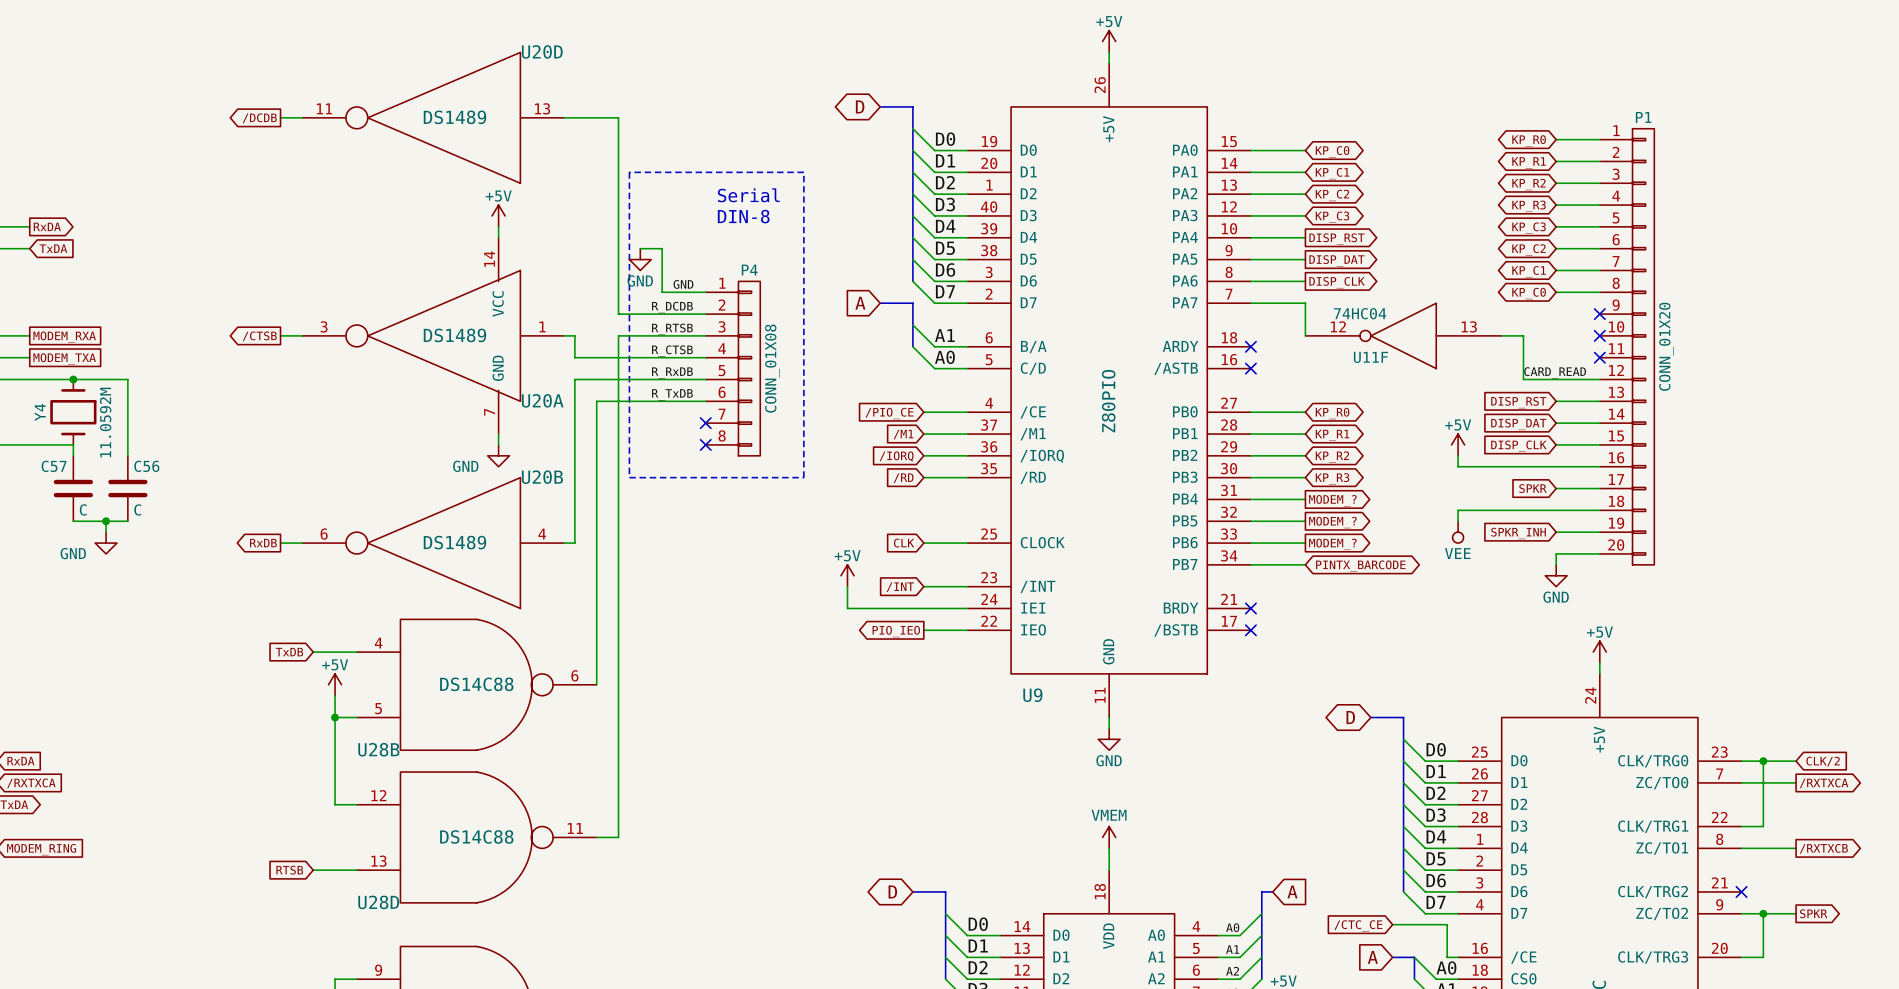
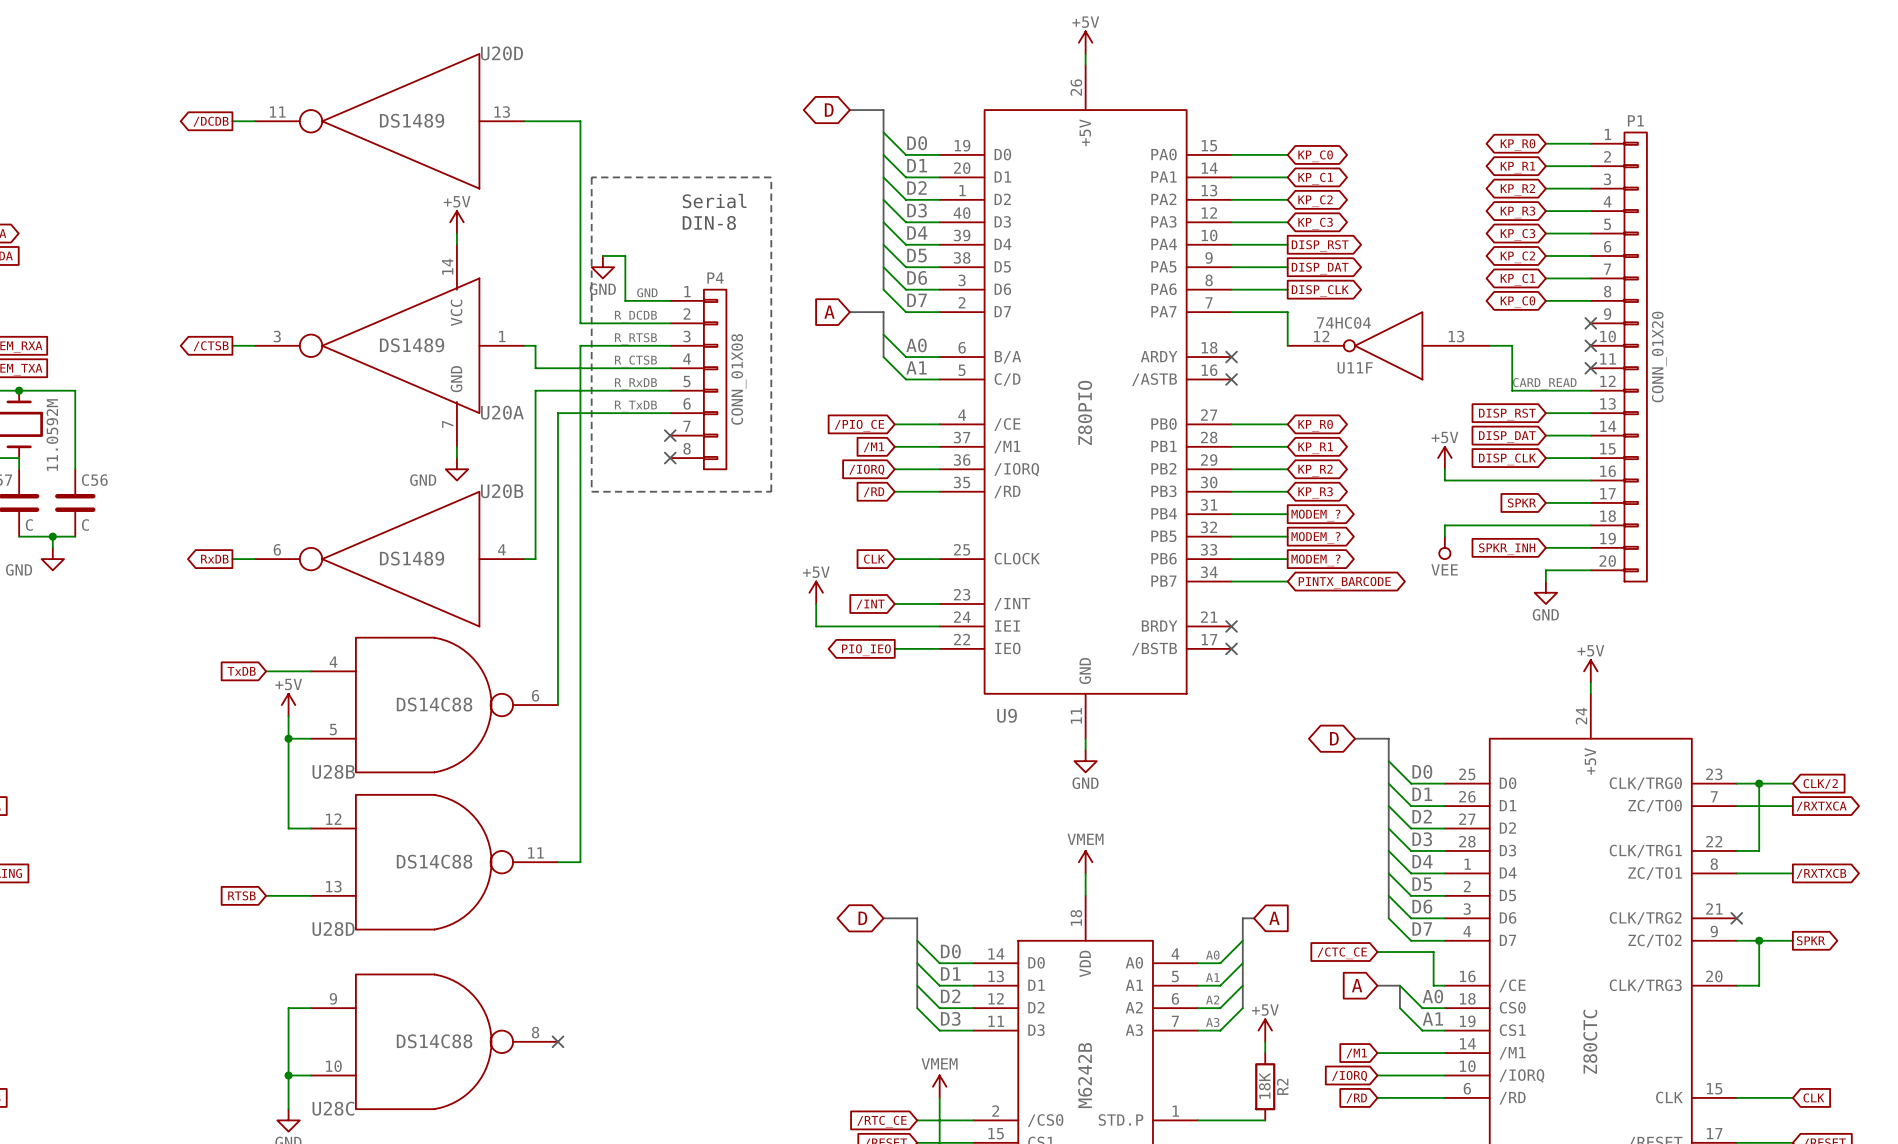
label: A1 (944, 335) -> A0 (916, 345)
label: A0 (944, 357) -> A1 (916, 367)

